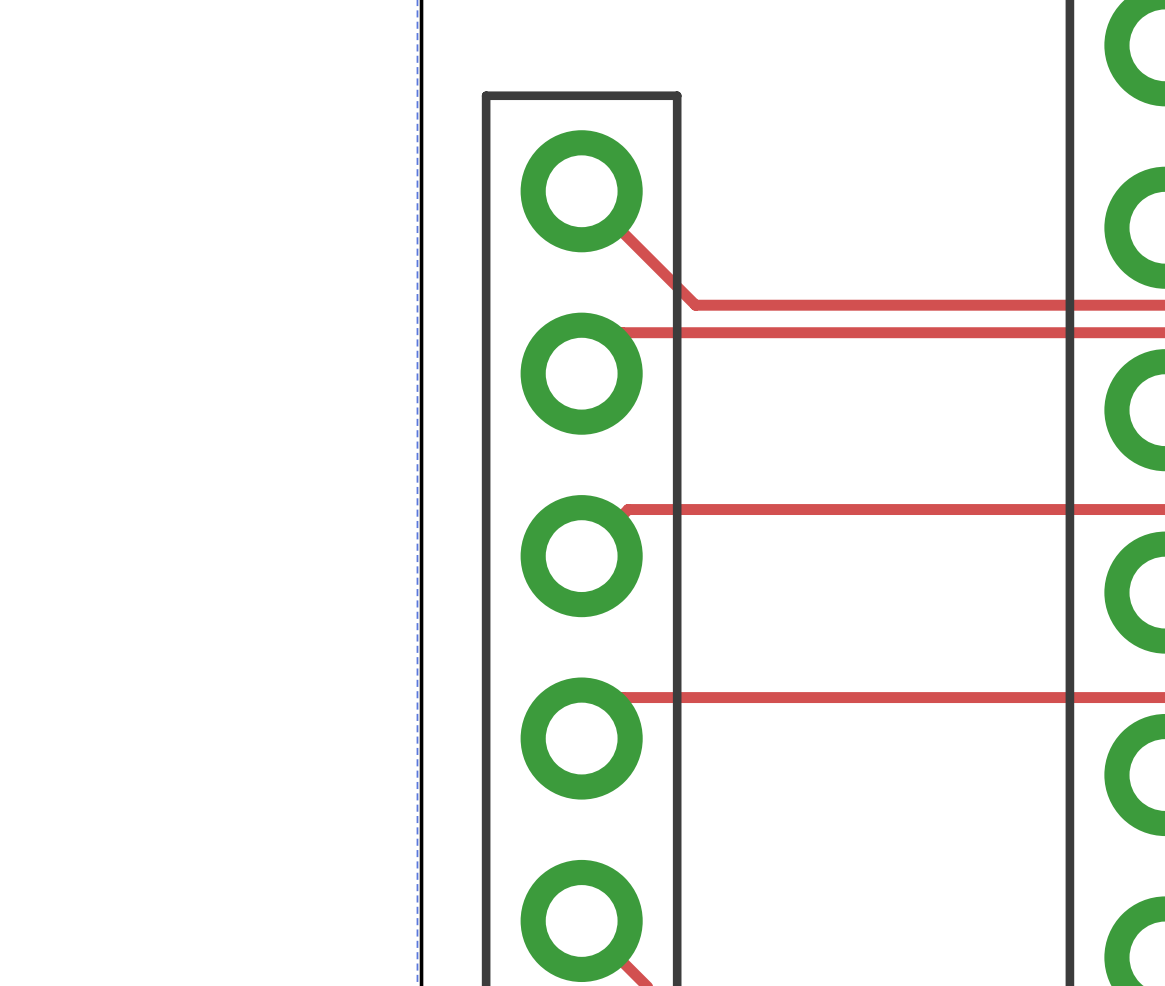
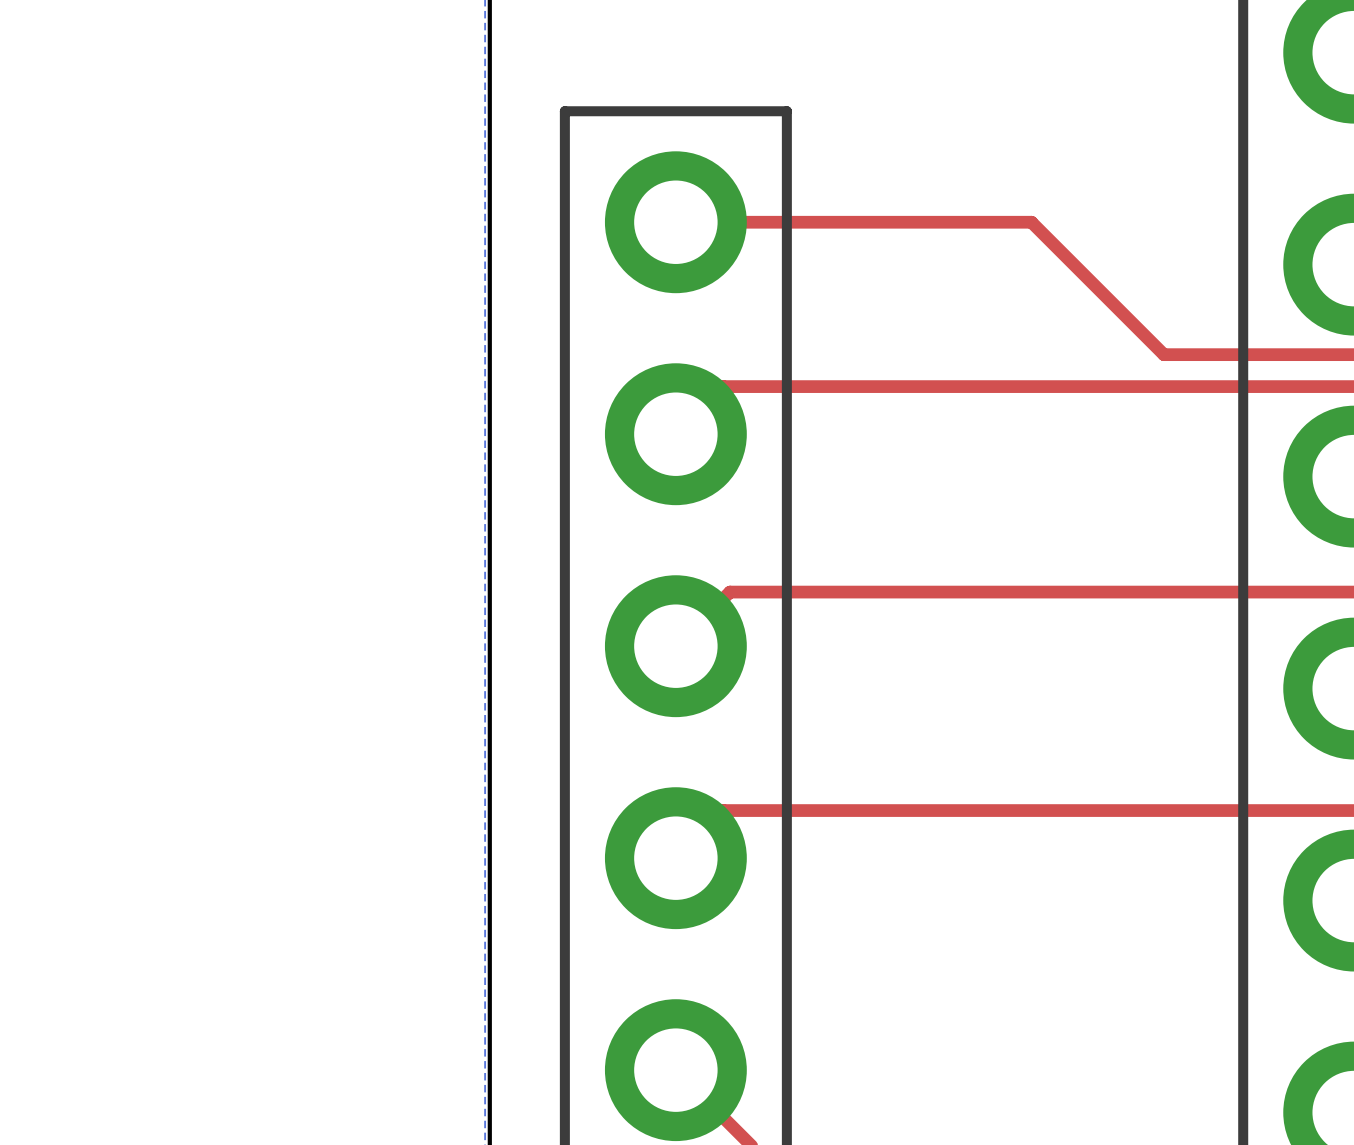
top track: (581, 191) (695, 305) (1001, 305) -> (675, 222) (1031, 222) (1163, 354)

